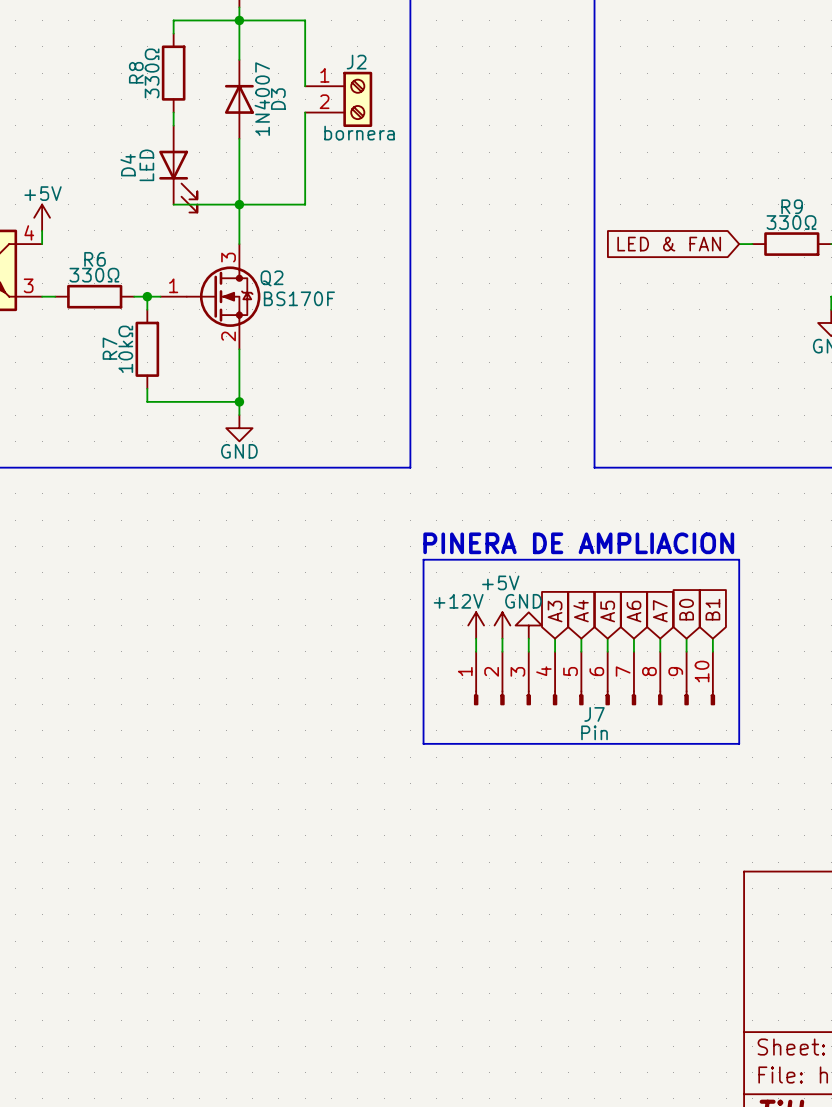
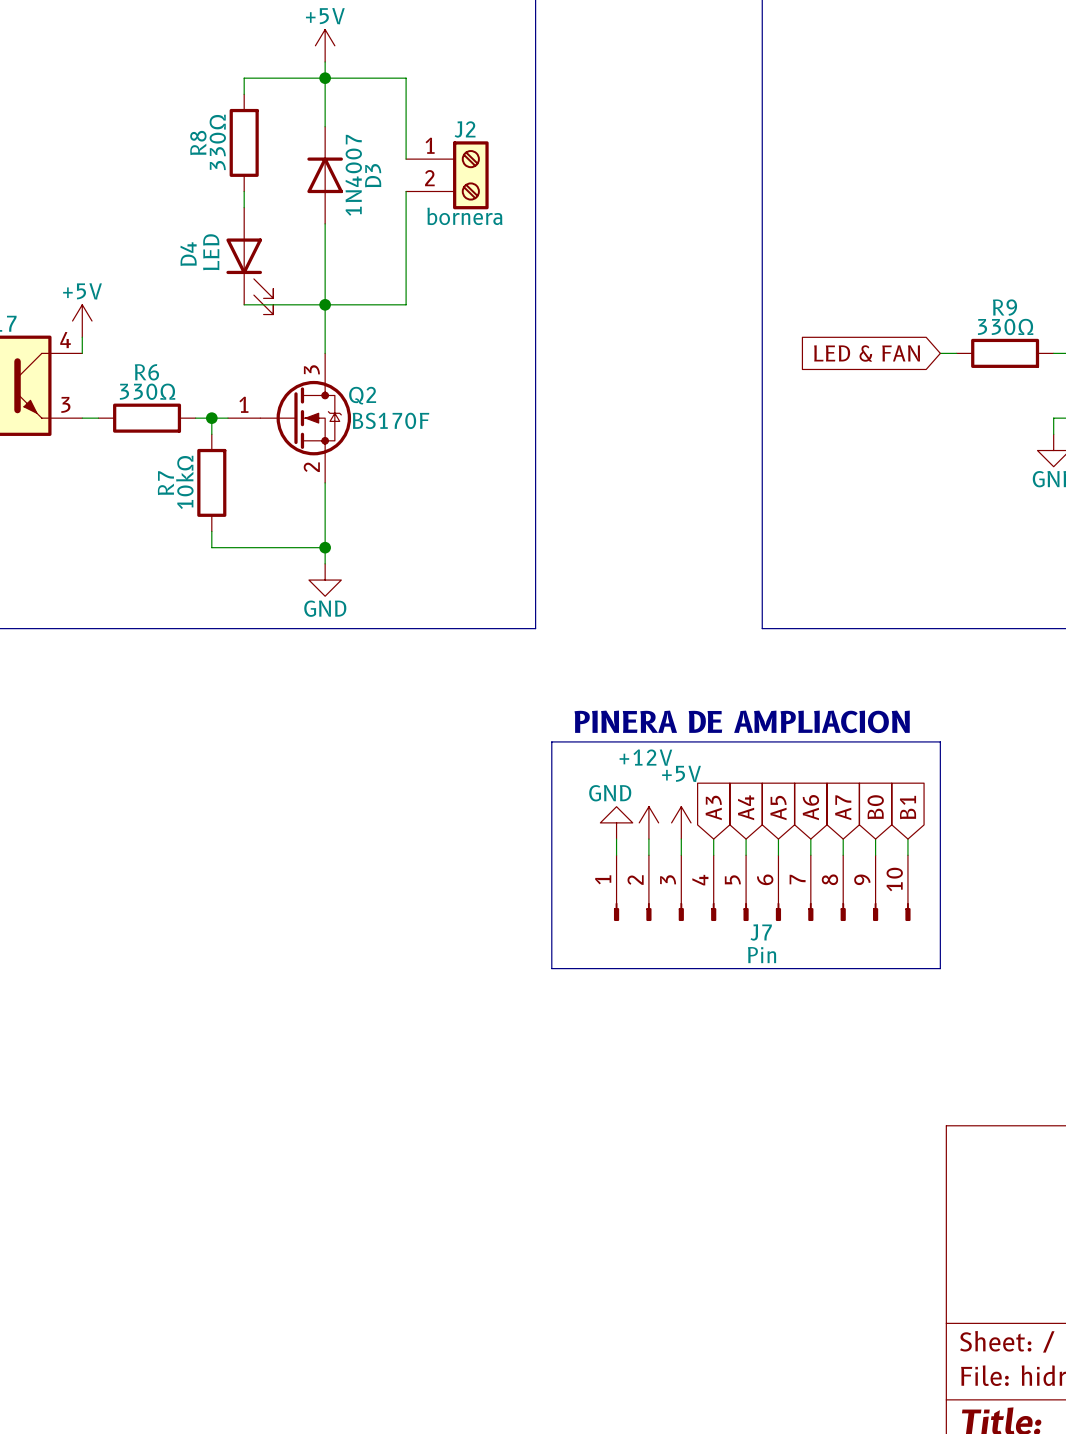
power symbol: +12V (476, 625) -> GND (616, 822)
power symbol: +5V (502, 625) -> +12V (648, 822)
power symbol: GND (528, 625) -> +5V (681, 822)

